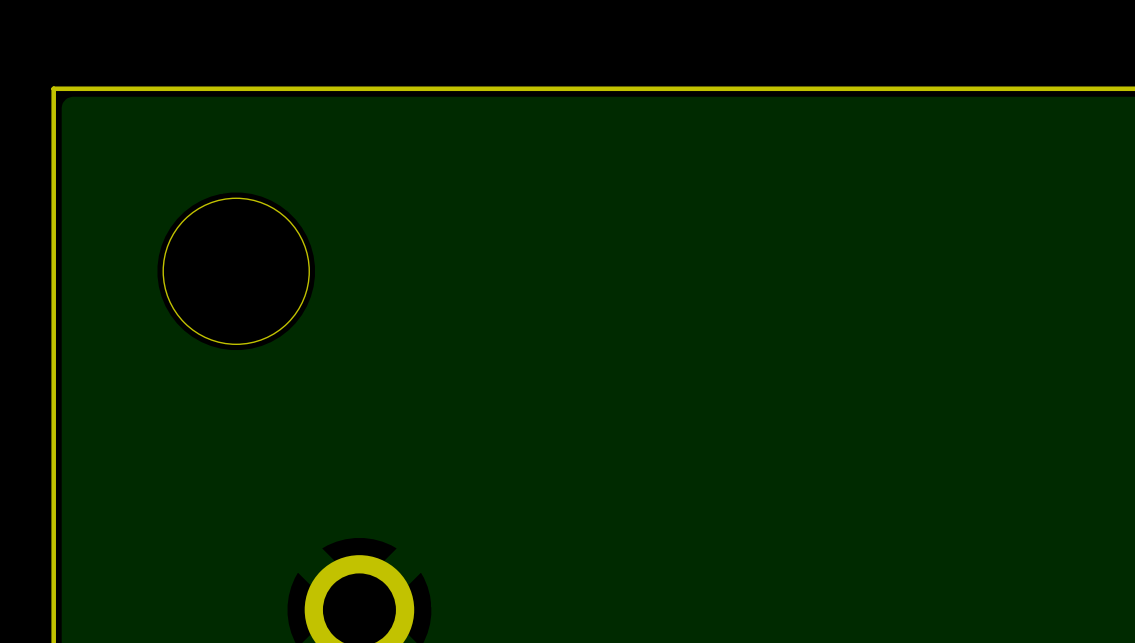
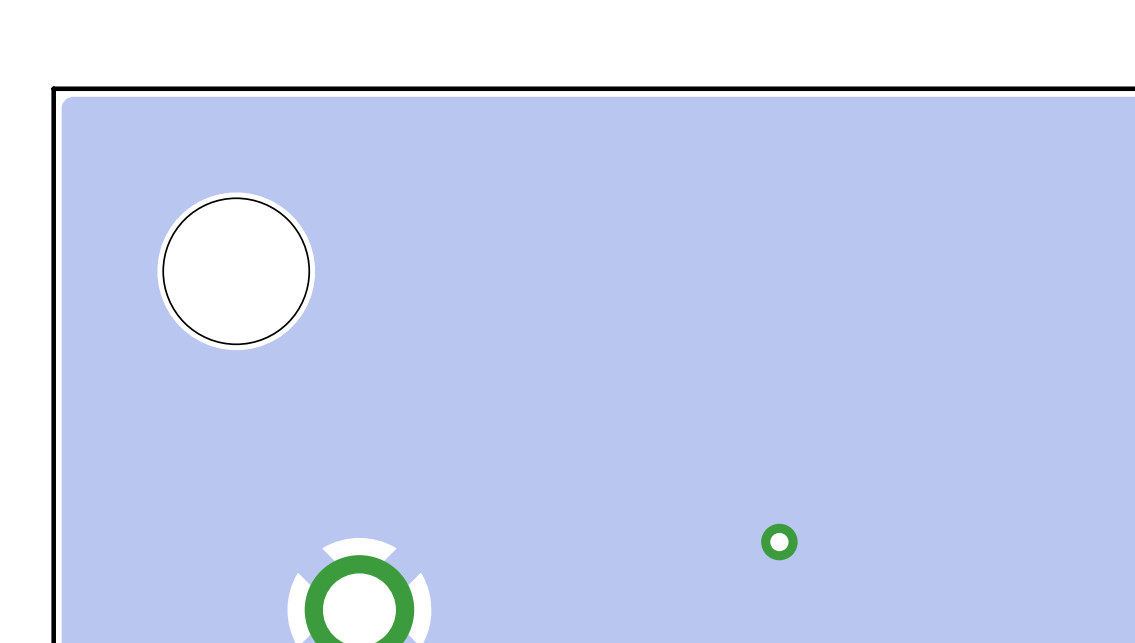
via: none -> (779, 542)

